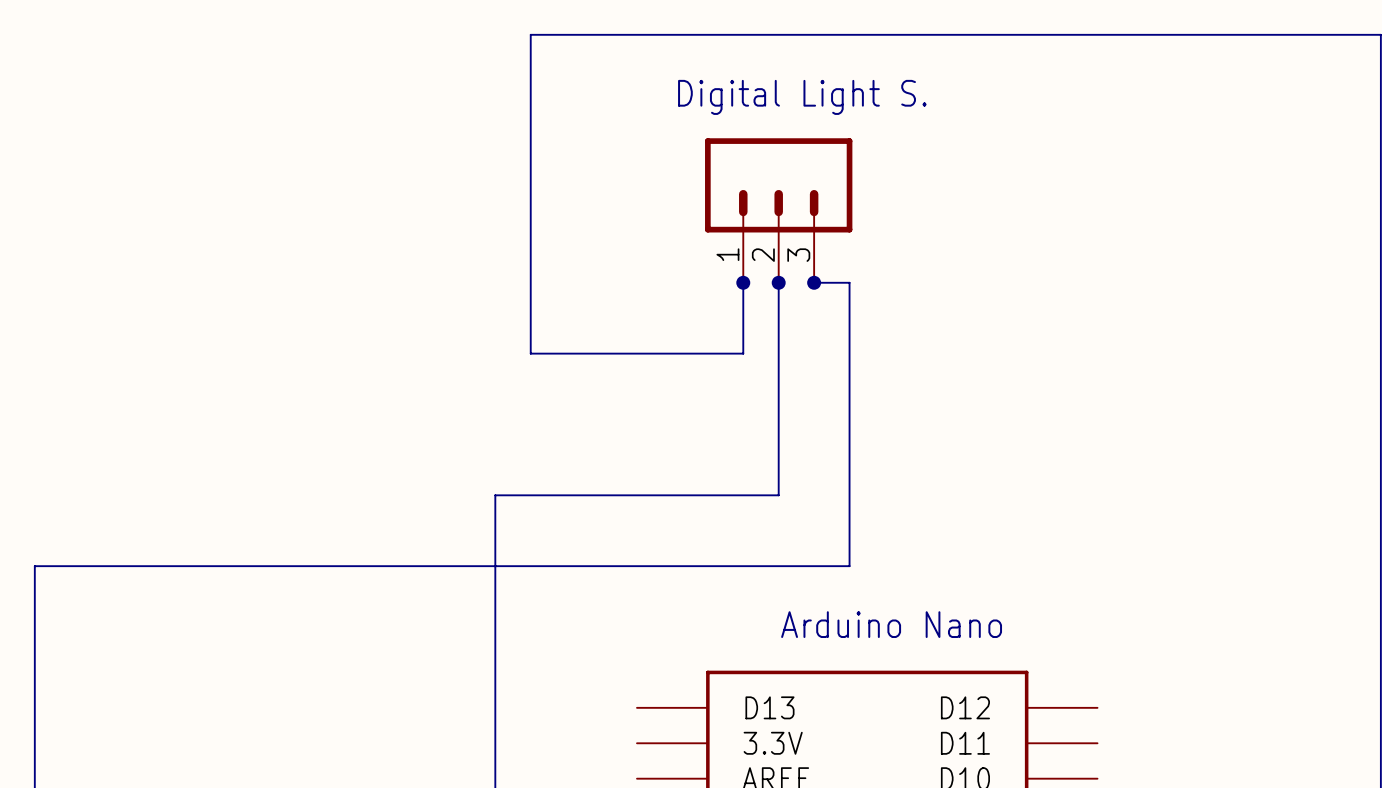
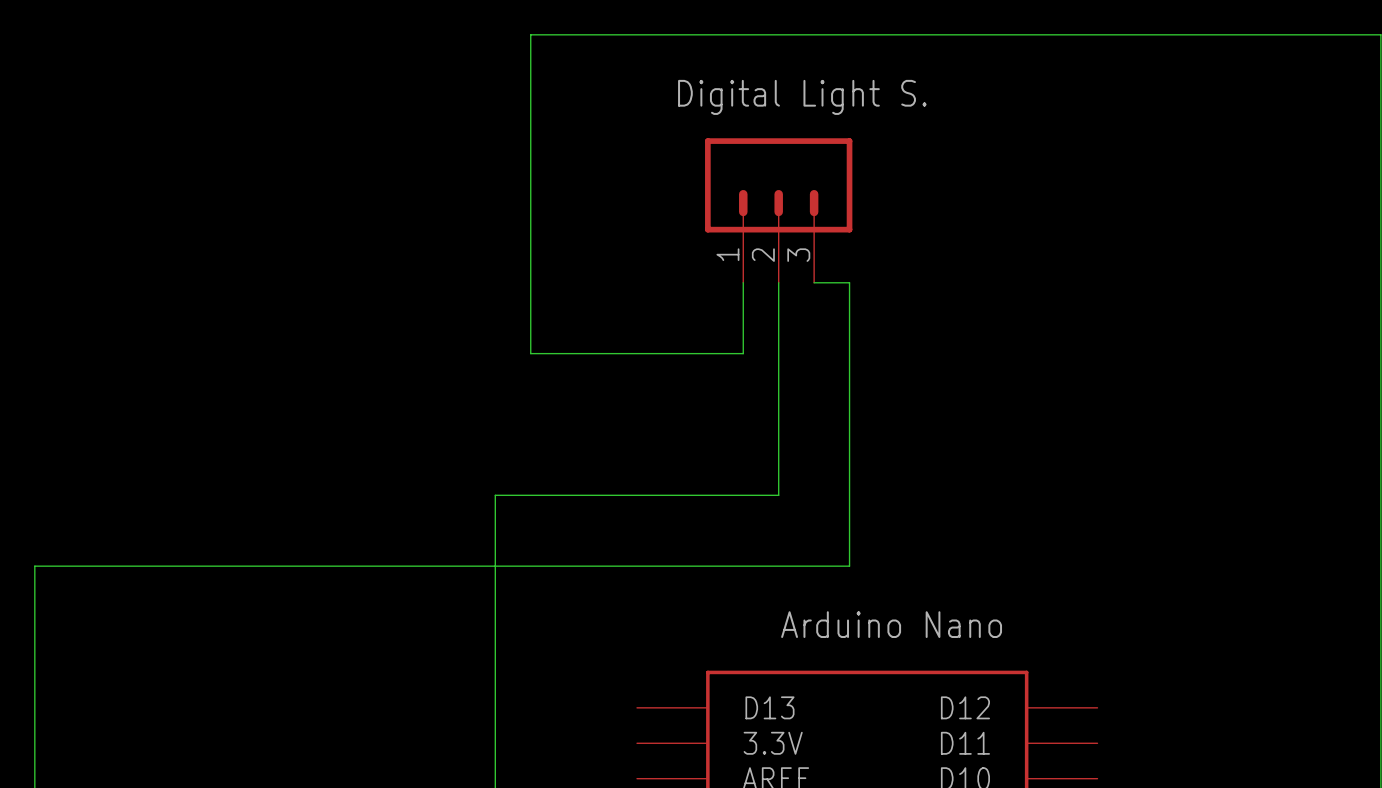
junction: (743, 282) -> none
junction: (778, 282) -> none
junction: (814, 282) -> none

